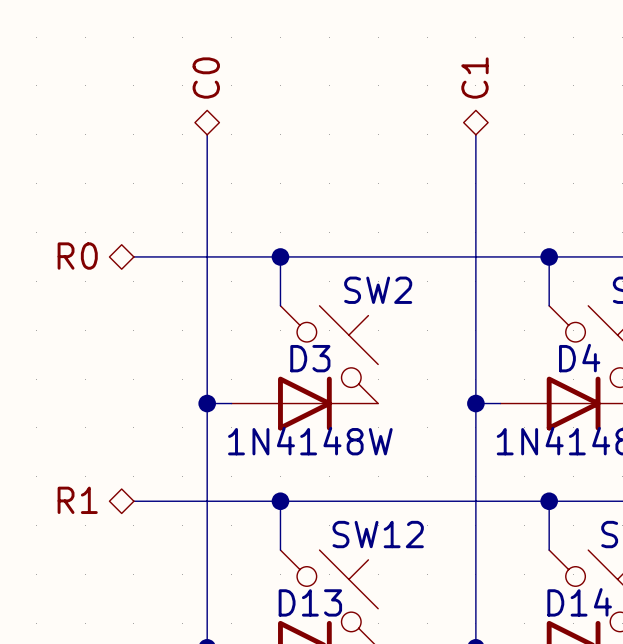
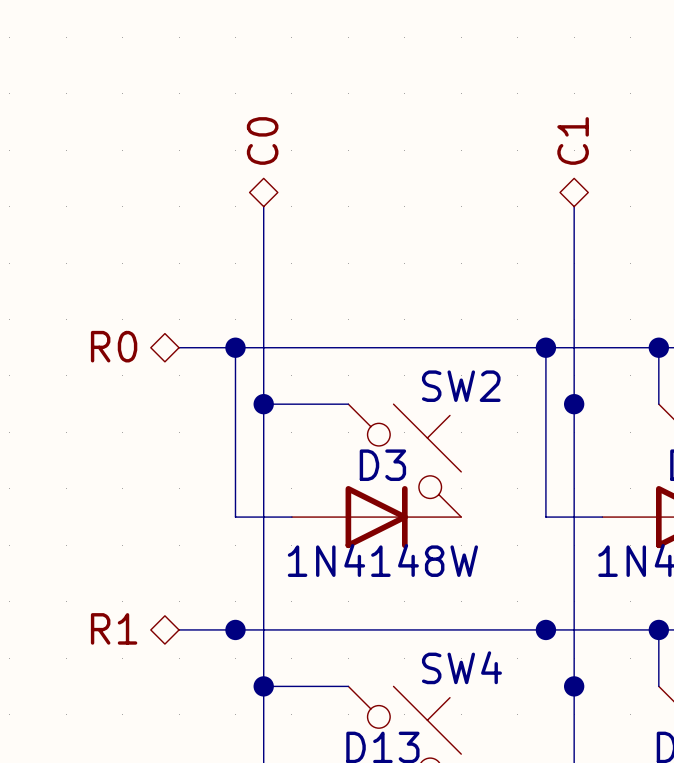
wire: none -> (235, 347) (235, 517) (263, 517)
junction: none -> (235, 347)
wire: (280, 256) (280, 305) -> (263, 404) (348, 404)
junction: (280, 256) -> none
wire: none -> (545, 347) (545, 517) (574, 517)
junction: none -> (545, 347)
junction: none -> (263, 404)
junction: none -> (574, 404)
junction: (207, 403) -> none
junction: (475, 403) -> none
junction: none -> (235, 629)
wire: (280, 501) (280, 550) -> (263, 686) (348, 686)
junction: (280, 501) -> none
junction: none -> (545, 629)
SW12 name: SW12 (378, 534) -> SW4 (461, 667)
junction: none -> (263, 686)
junction: none -> (574, 686)

